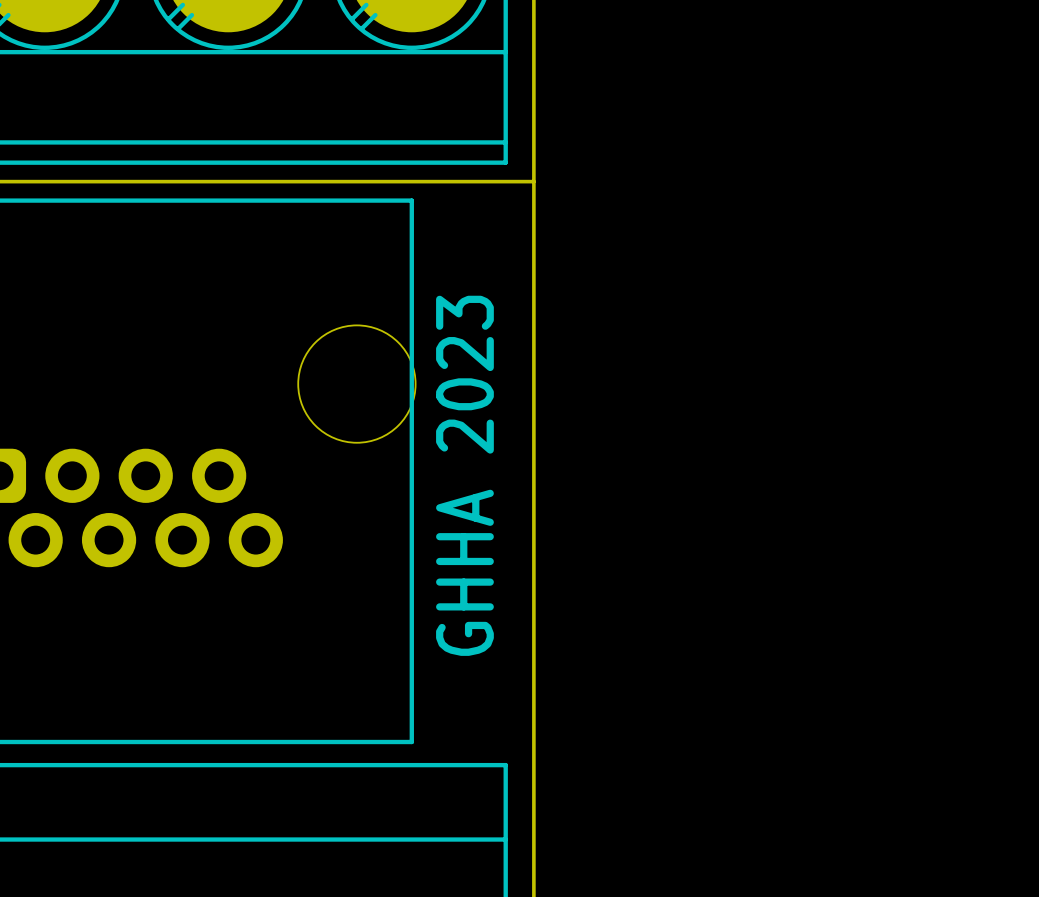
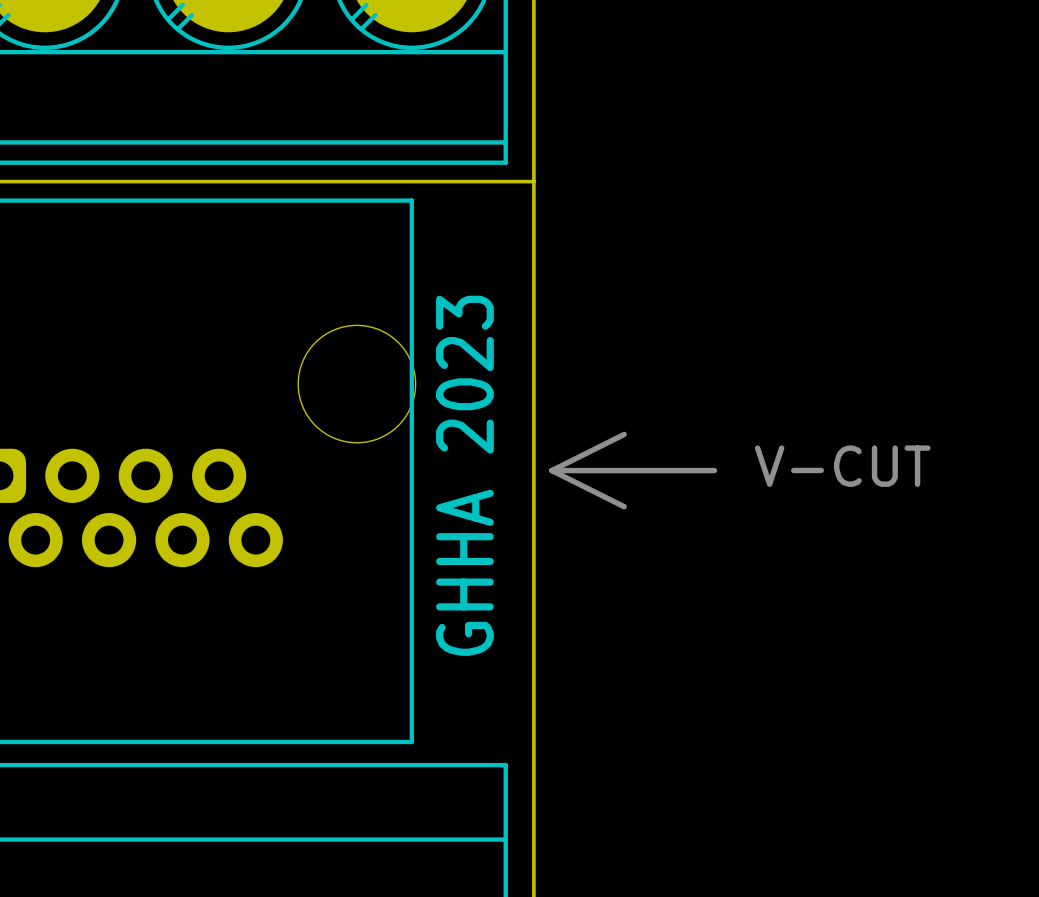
line: none -> (624, 434) (551, 470)
text: none -> V-CUT (842, 466)
line: none -> (551, 470) (624, 506)
line: none -> (551, 470) (714, 470)

